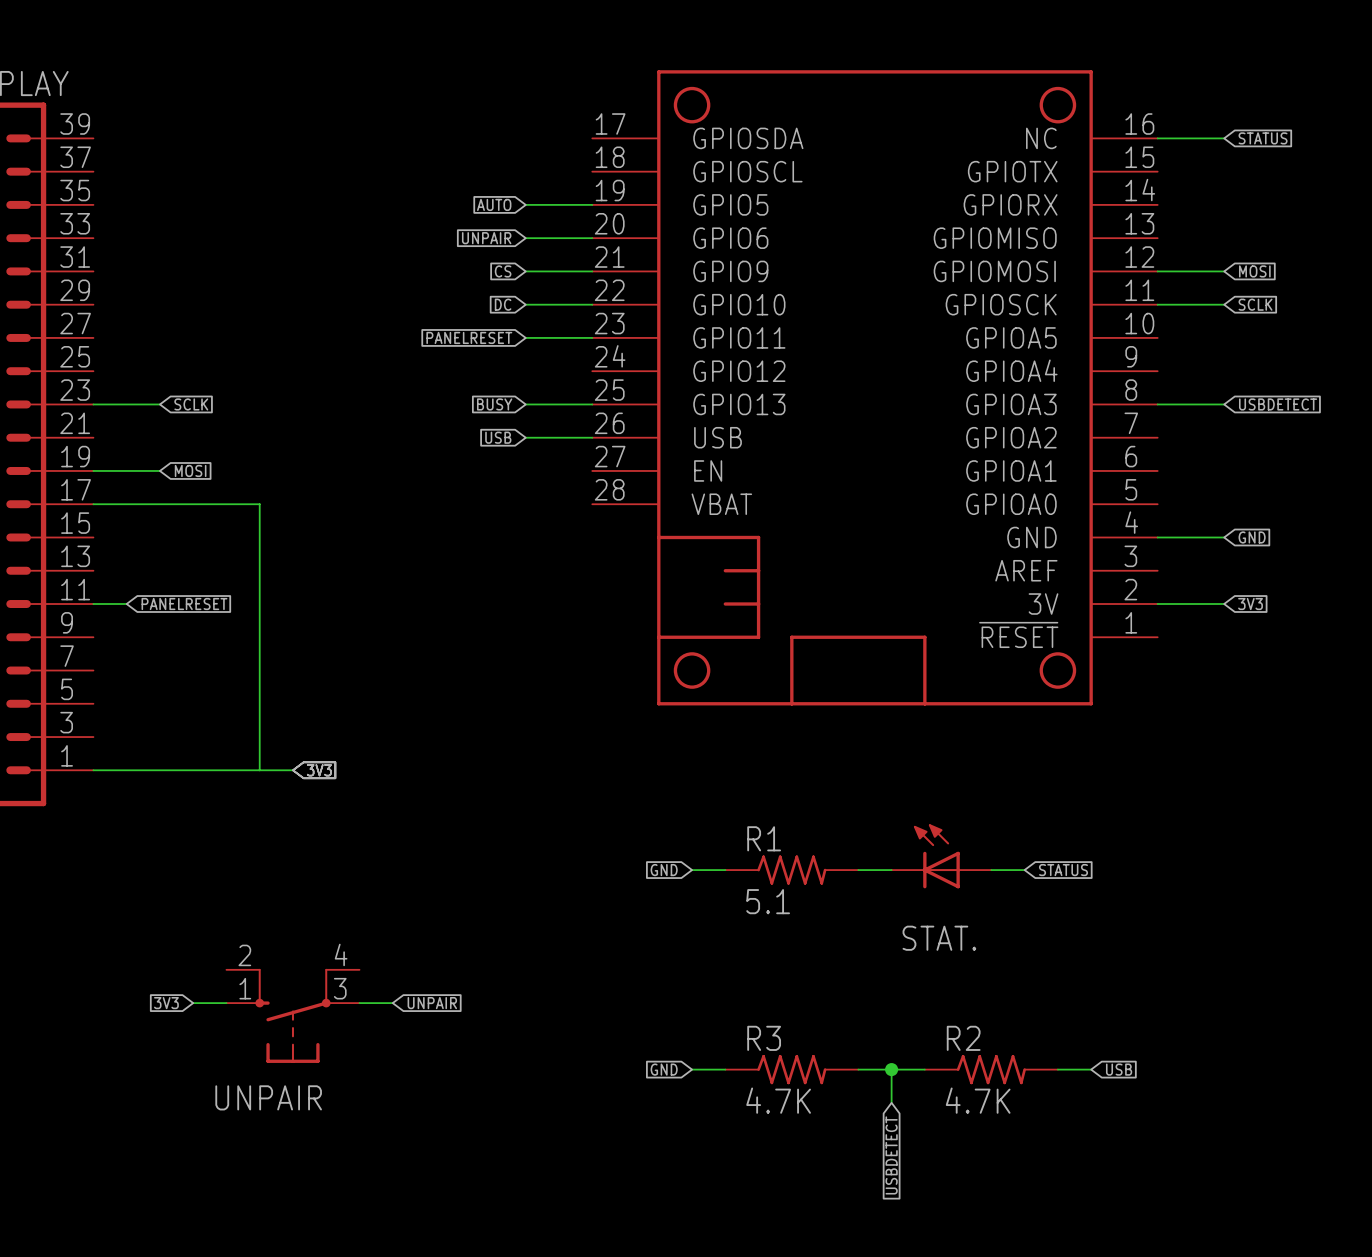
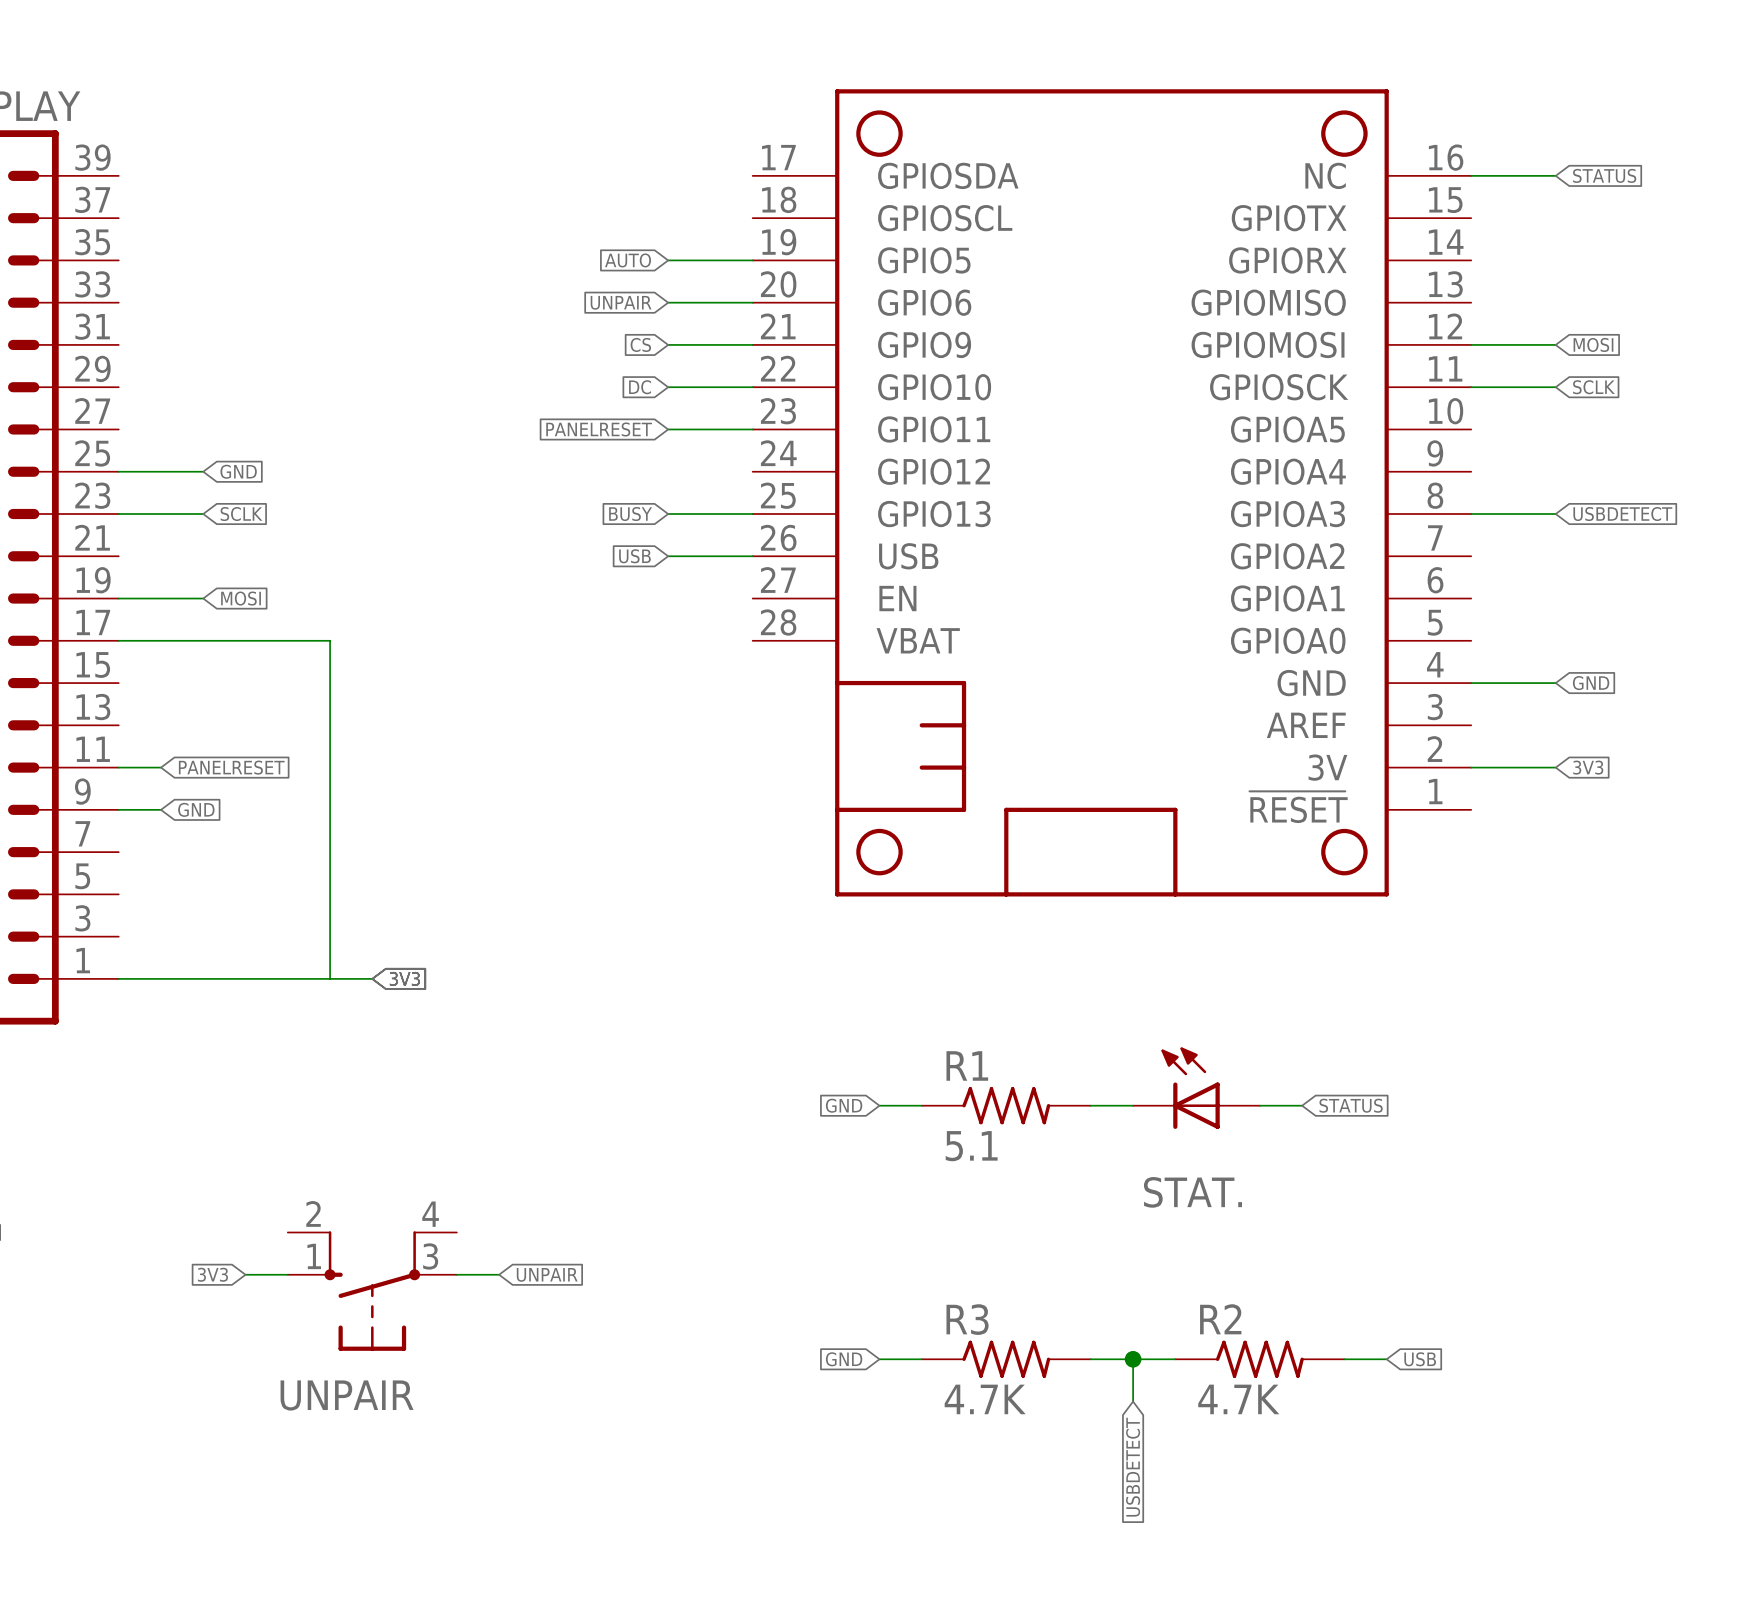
wire: none -> (118, 471) (203, 471)
global label: none -> GND (238, 471)
wire: none -> (118, 809) (161, 809)
global label: none -> GND (196, 809)

